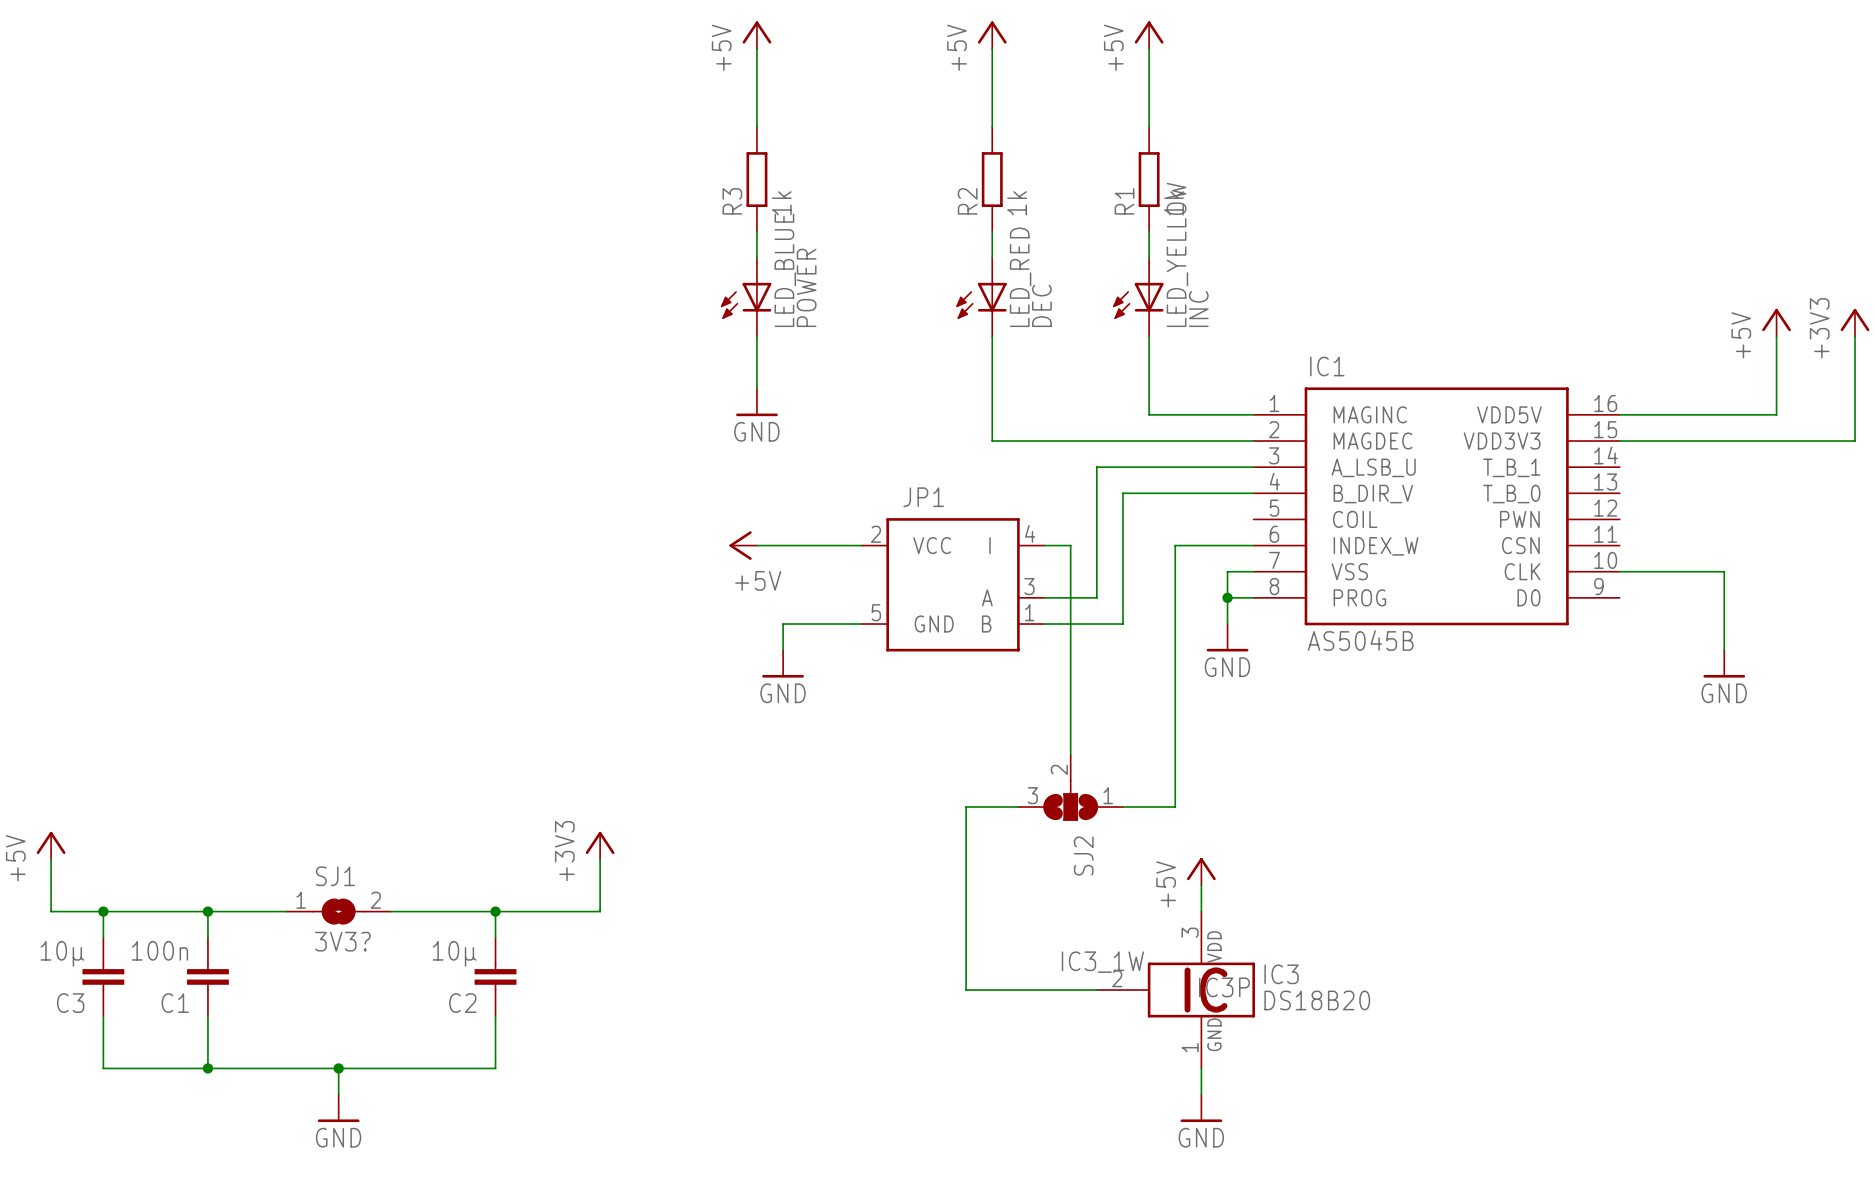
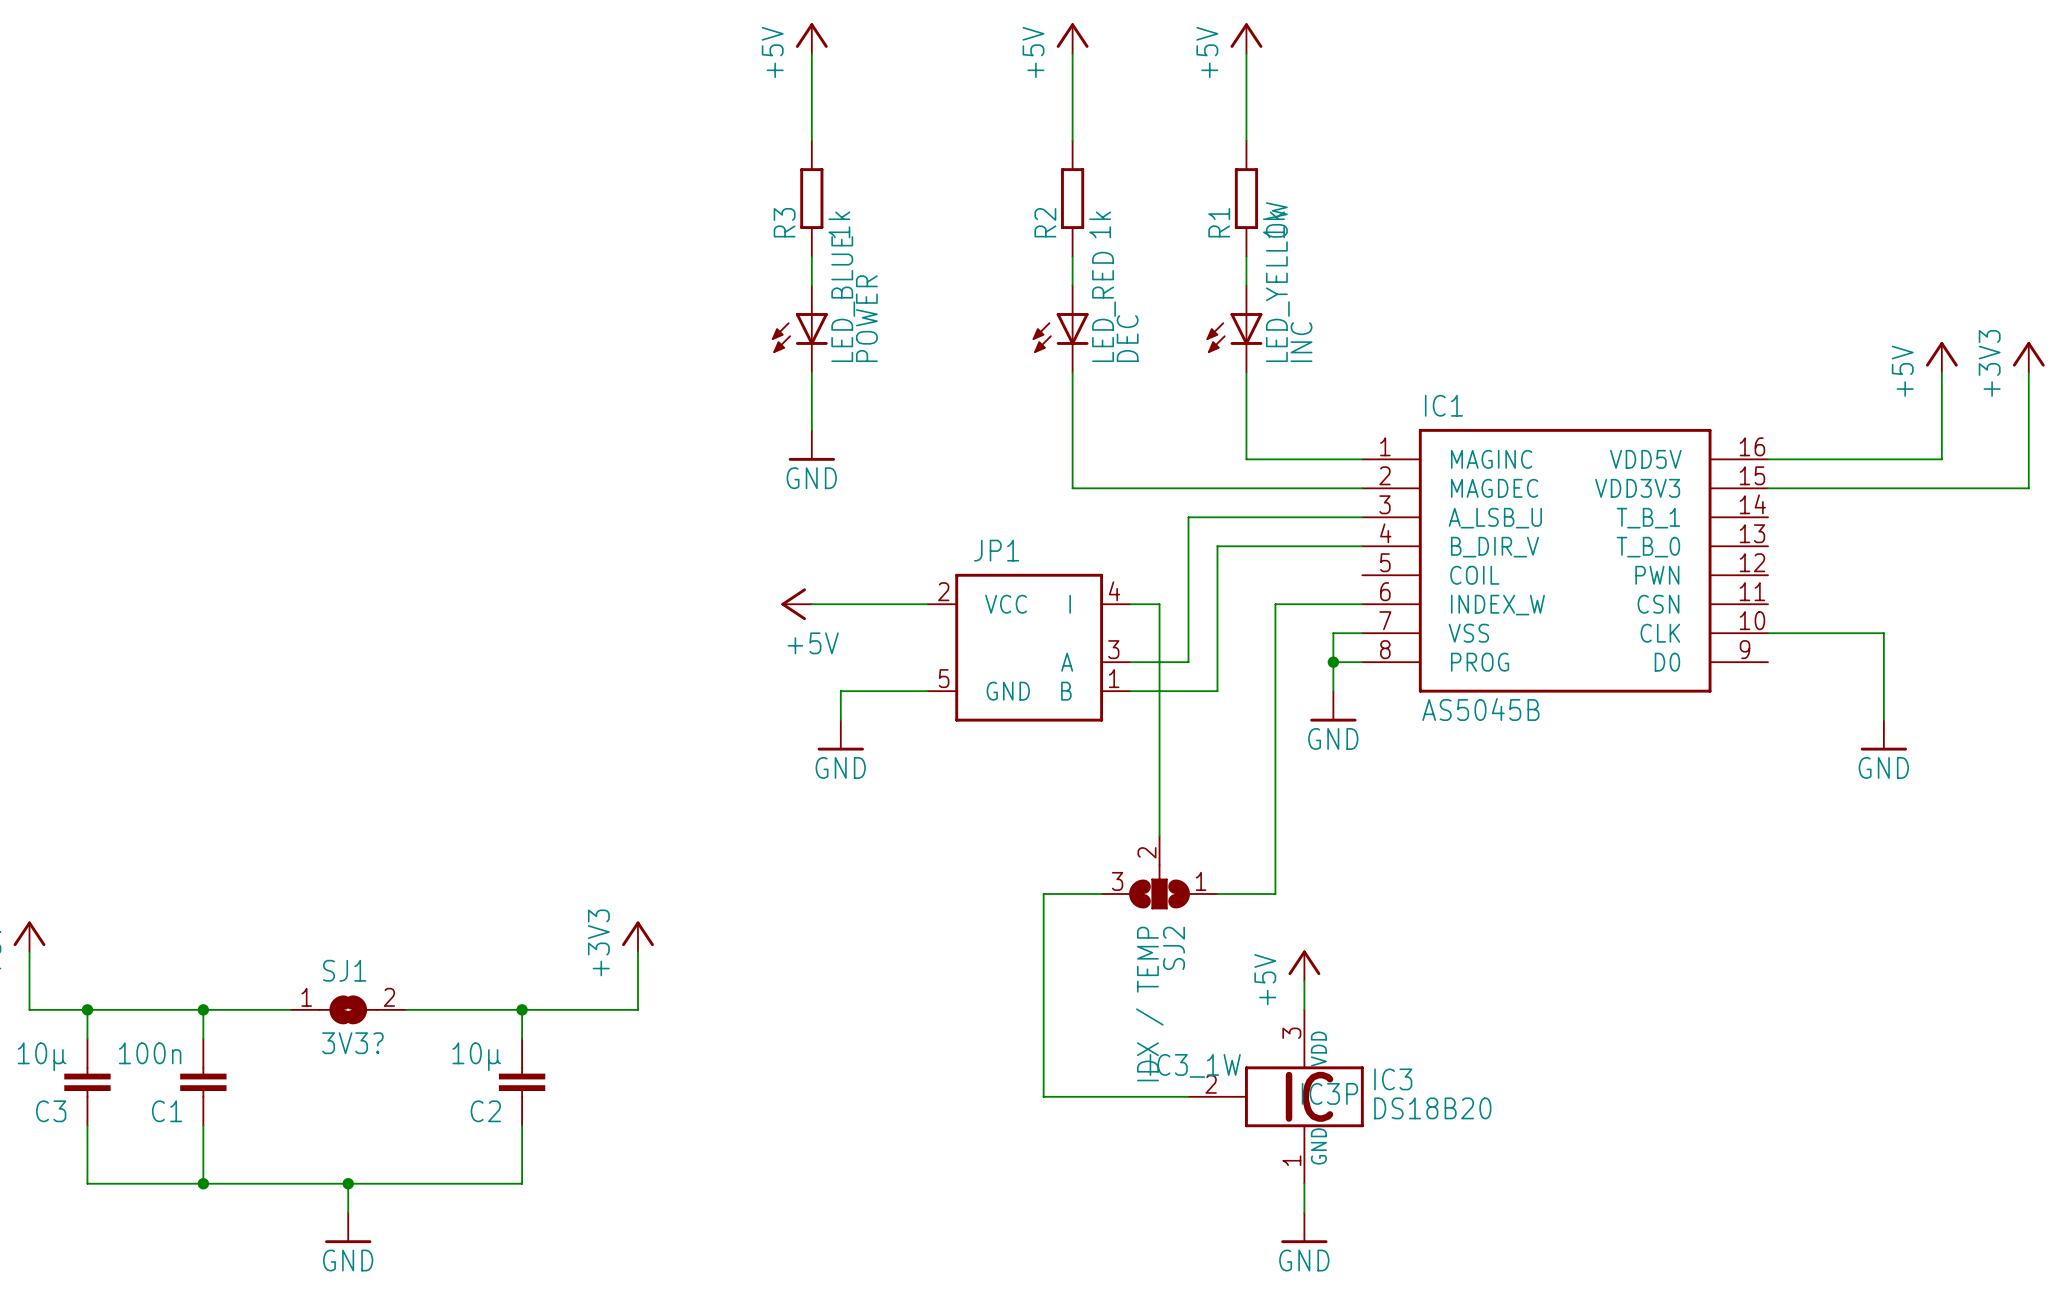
SJ2 value: none -> IDX / TEMP (1149, 1004)

